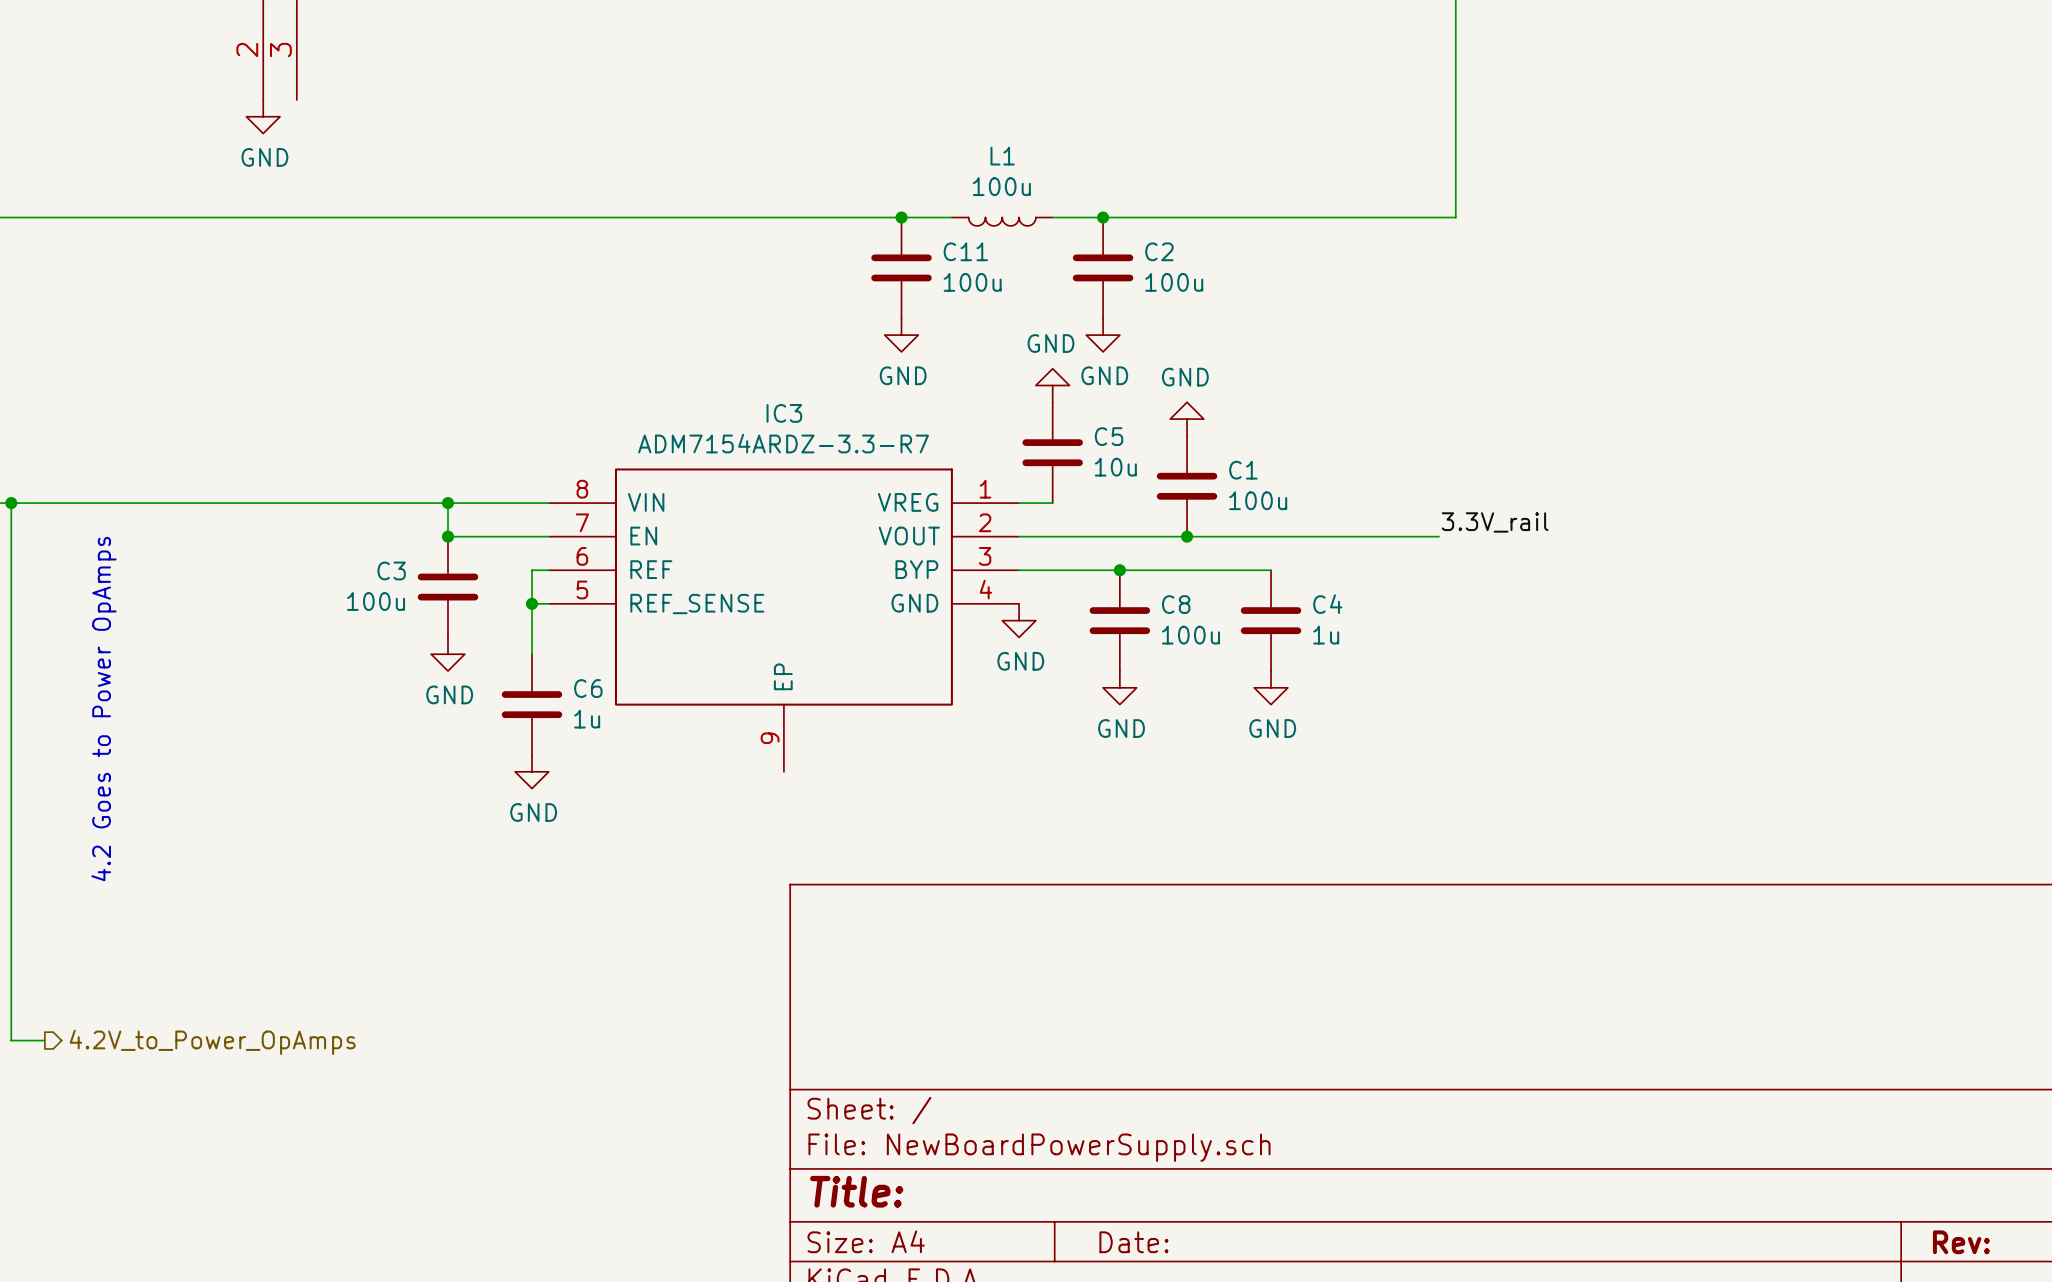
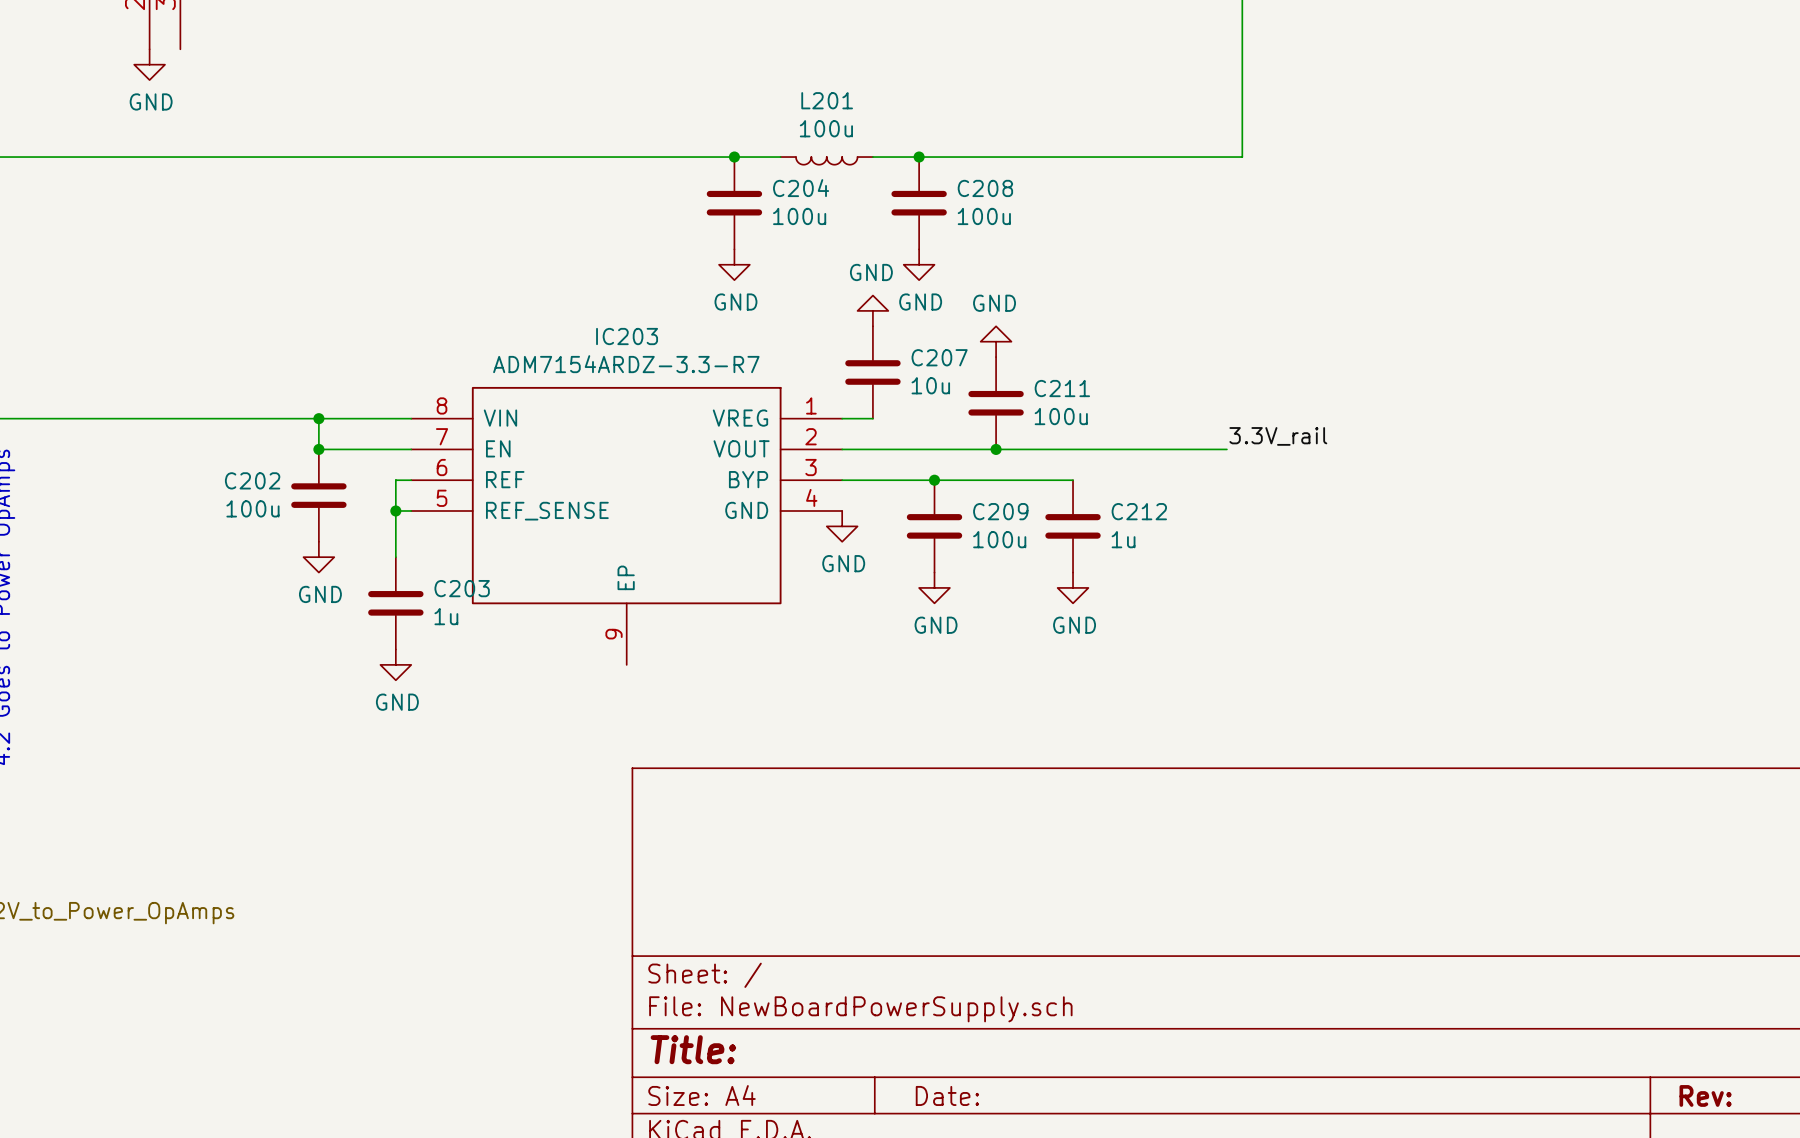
L1 name: L1 (1002, 156) -> L201 (827, 100)
C11 name: C11 (965, 251) -> C204 (801, 188)
C2 name: C2 (1159, 251) -> C208 (985, 188)
IC3 name: IC3 (784, 413) -> IC203 (627, 336)
C5 name: C5 (1109, 436) -> C207 (939, 357)
C1 name: C1 (1243, 470) -> C211 (1062, 388)
C3 name: C3 (391, 570) -> C202 (252, 480)
C8 name: C8 (1176, 604) -> C209 (1000, 511)
C4 name: C4 (1327, 604) -> C212 (1139, 511)
C6 name: C6 (588, 688) -> C203 (462, 588)

